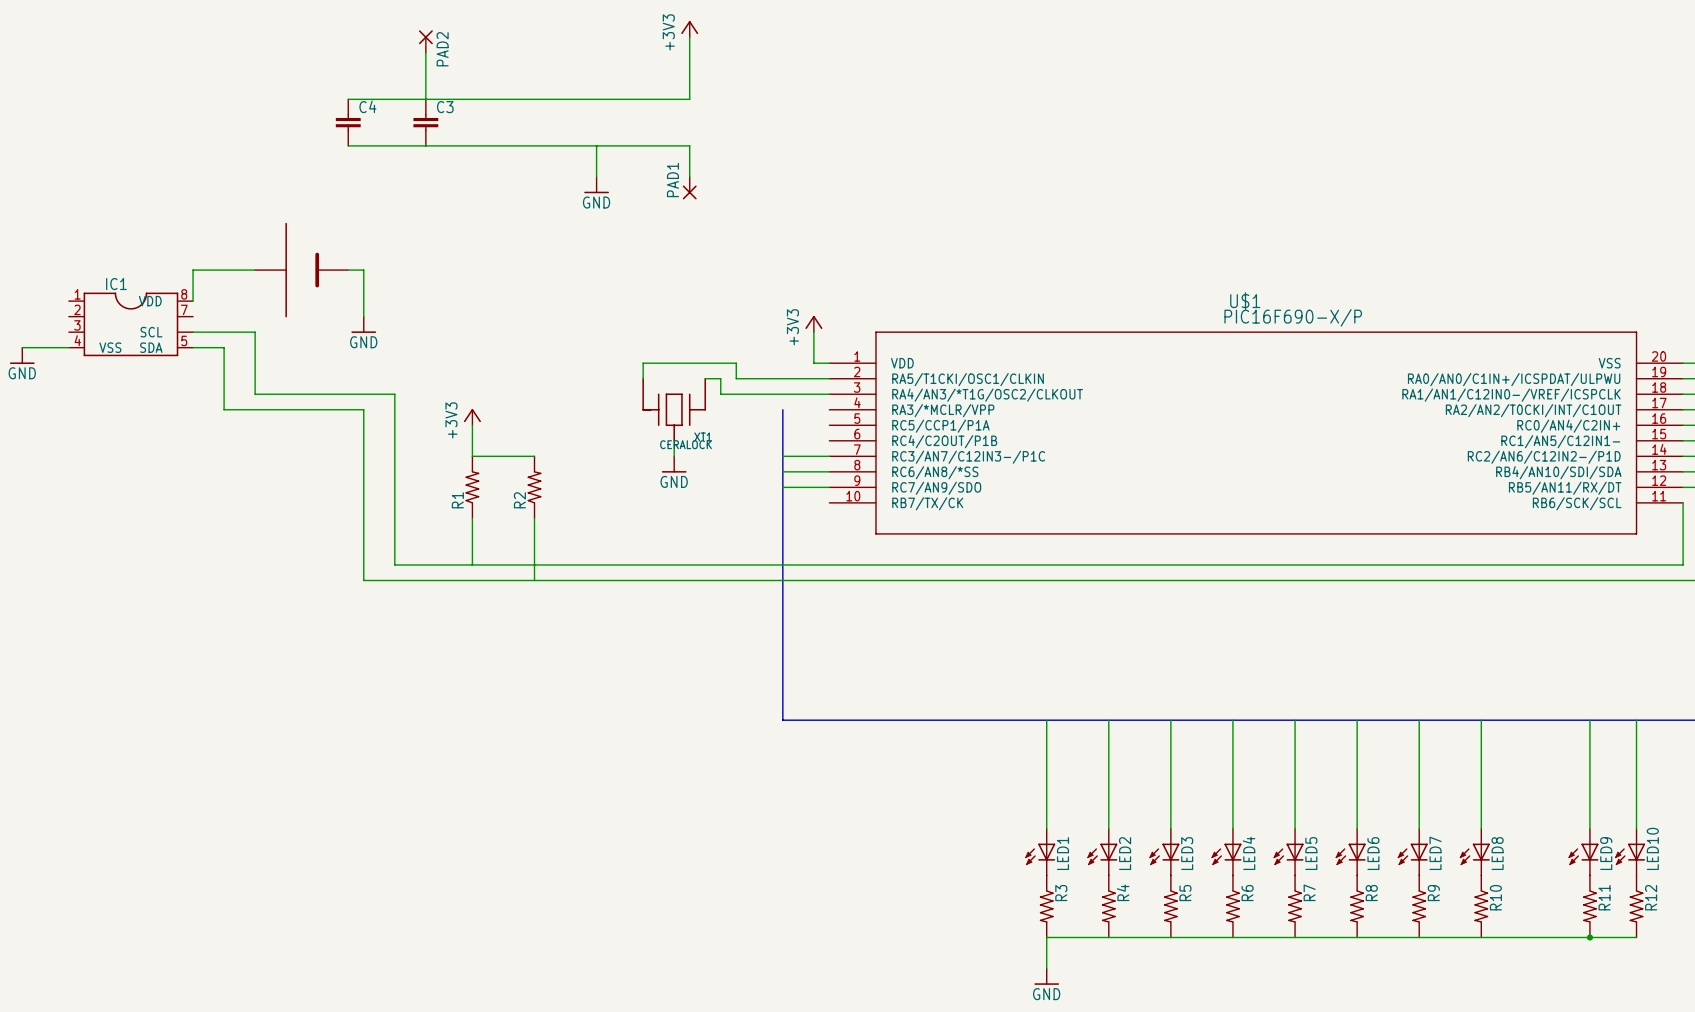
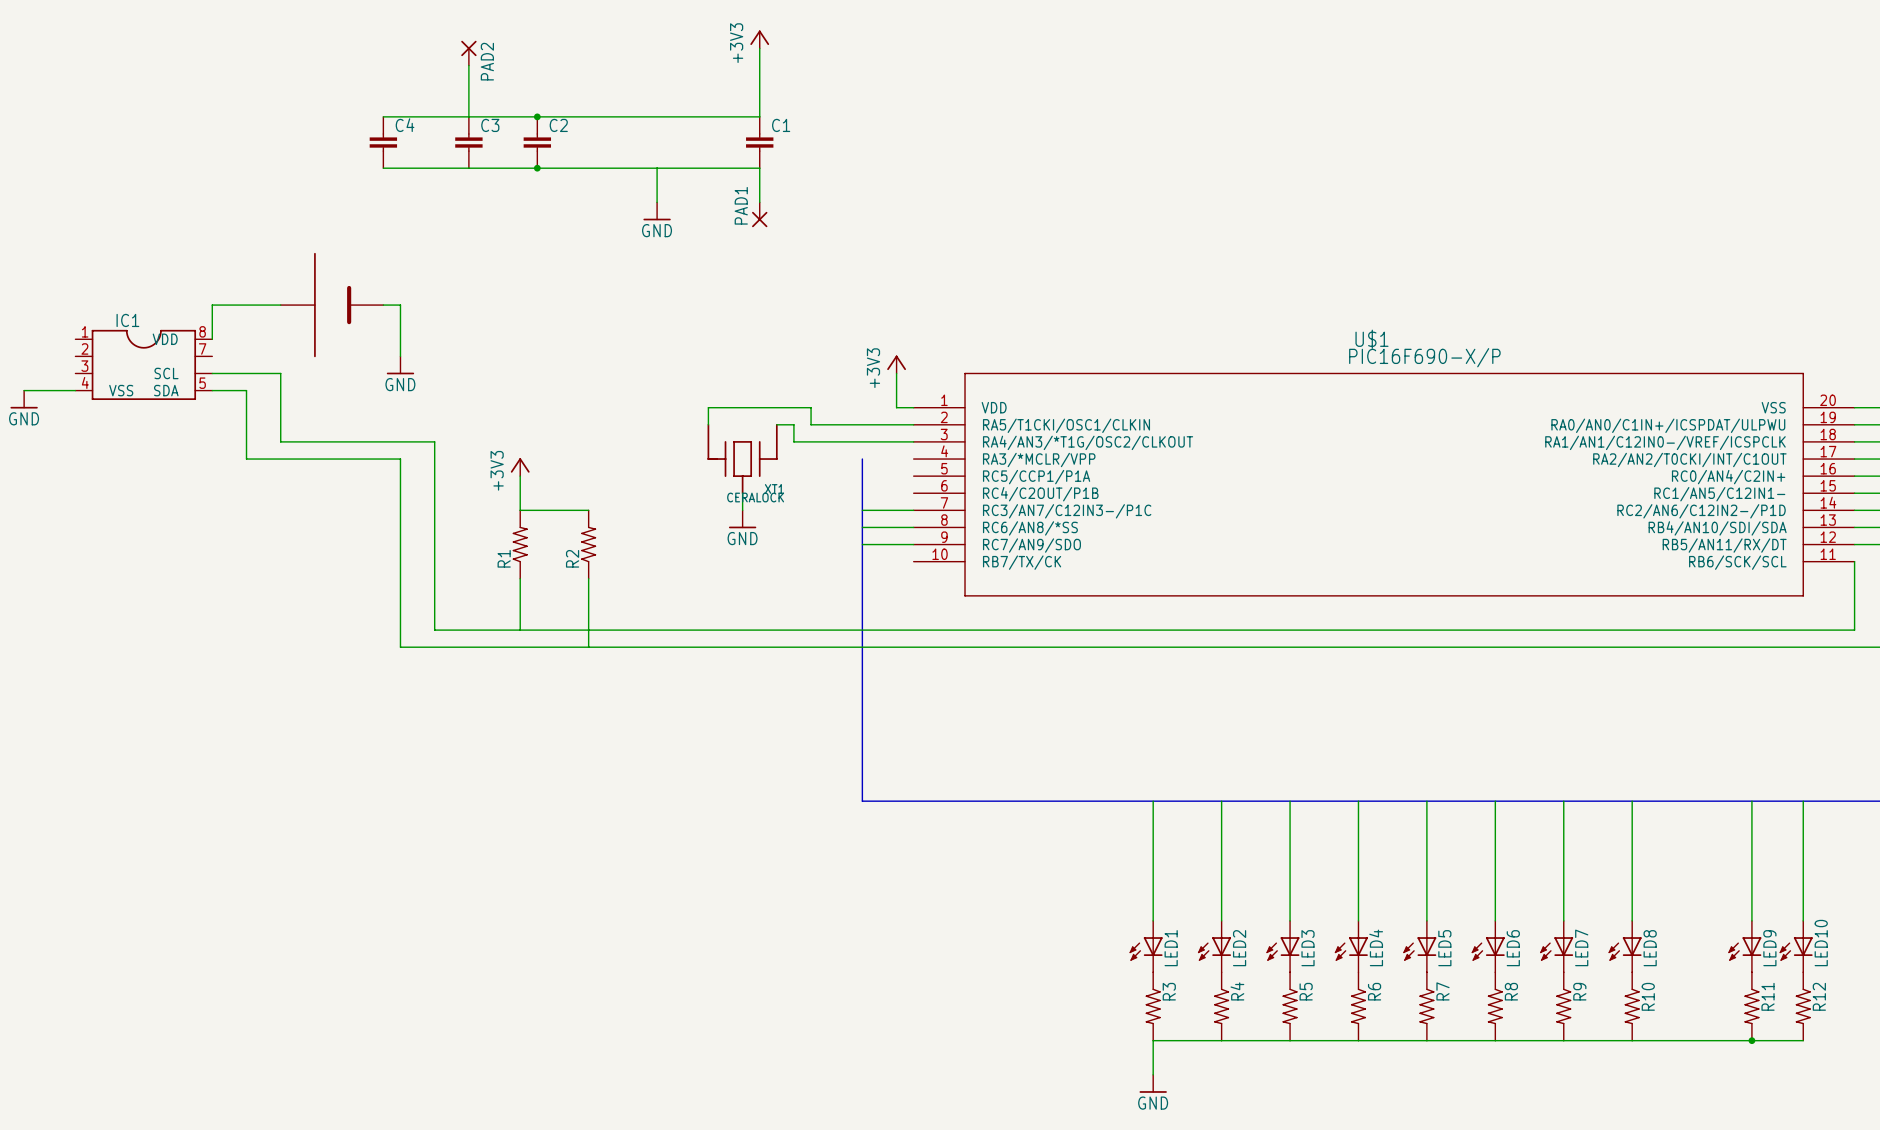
junction: none -> (537, 116)
C2: none -> (537, 142)
C1: none -> (759, 142)
junction: none -> (537, 168)

